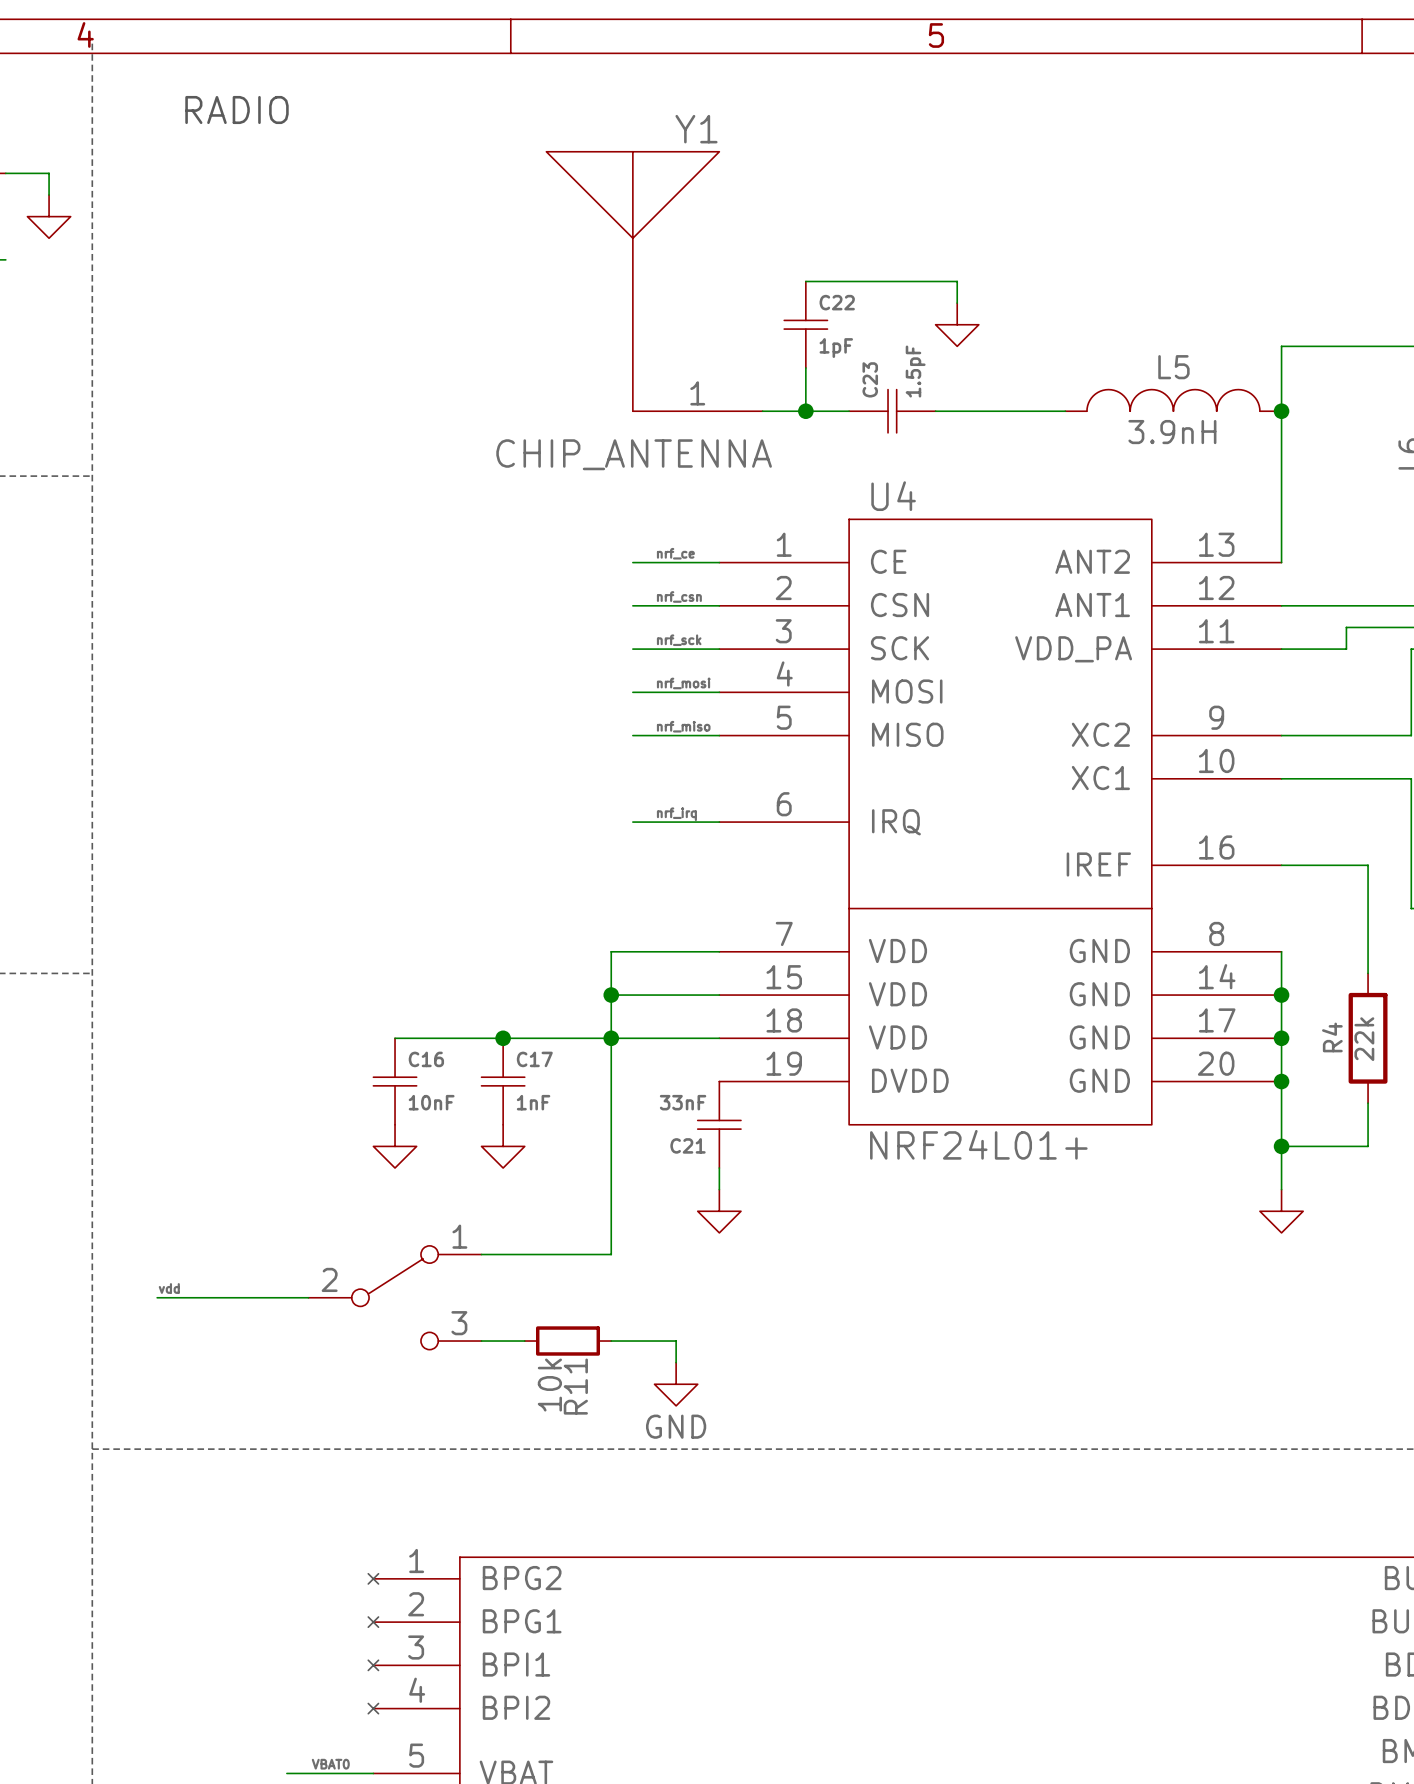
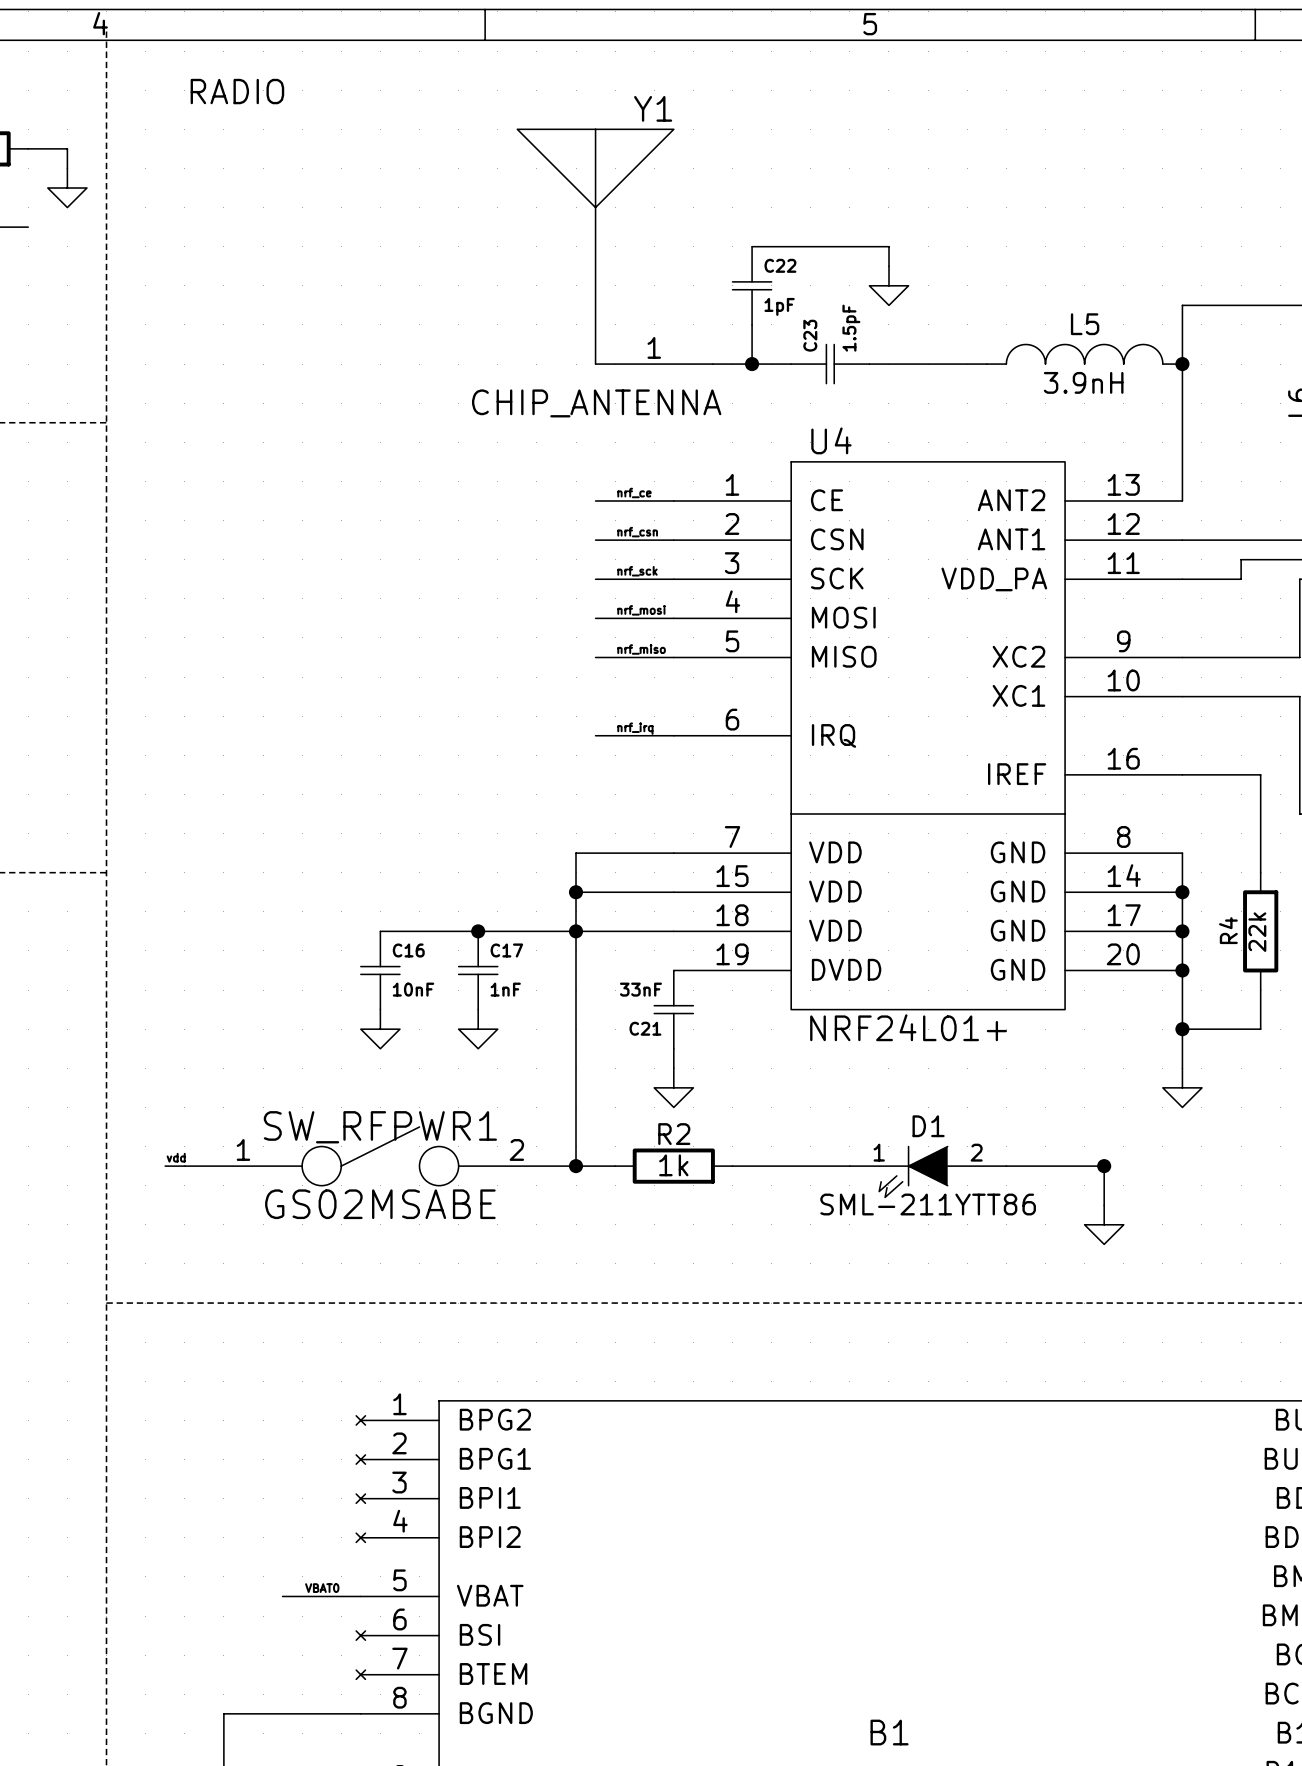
wire: (481, 1254) (611, 1254) -> (615, 1166) (576, 1166) (576, 1126)
SW_RFPWR1: none -> GS02MSABE (380, 1156)
part: (395, 1297) -> none
junction: none -> (576, 1166)
R2: none -> 1k (673, 1166)
wire: none -> (732, 1166) (849, 1166)
wire: none -> (1006, 1166) (1104, 1166) (1104, 1205)
junction: none -> (1104, 1166)
D1: none -> SML-211YTT86 (928, 1171)
wire: (481, 1341) (524, 1341) -> none
R11: 10k (568, 1341) -> none
wire: (611, 1341) (676, 1341) (676, 1362) -> none
power symbol: none -> (1104, 1224)
power symbol: GND (676, 1384) -> none

